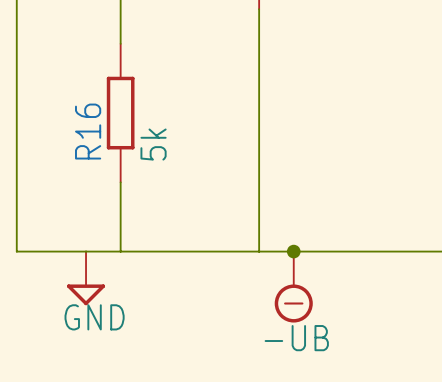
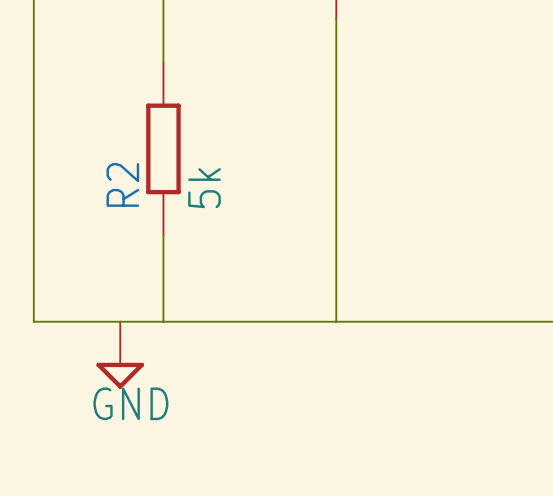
R16 name: R16 (88, 131) -> R2 (122, 184)
junction: (293, 251) -> none
power symbol: -UB (293, 287) -> none

